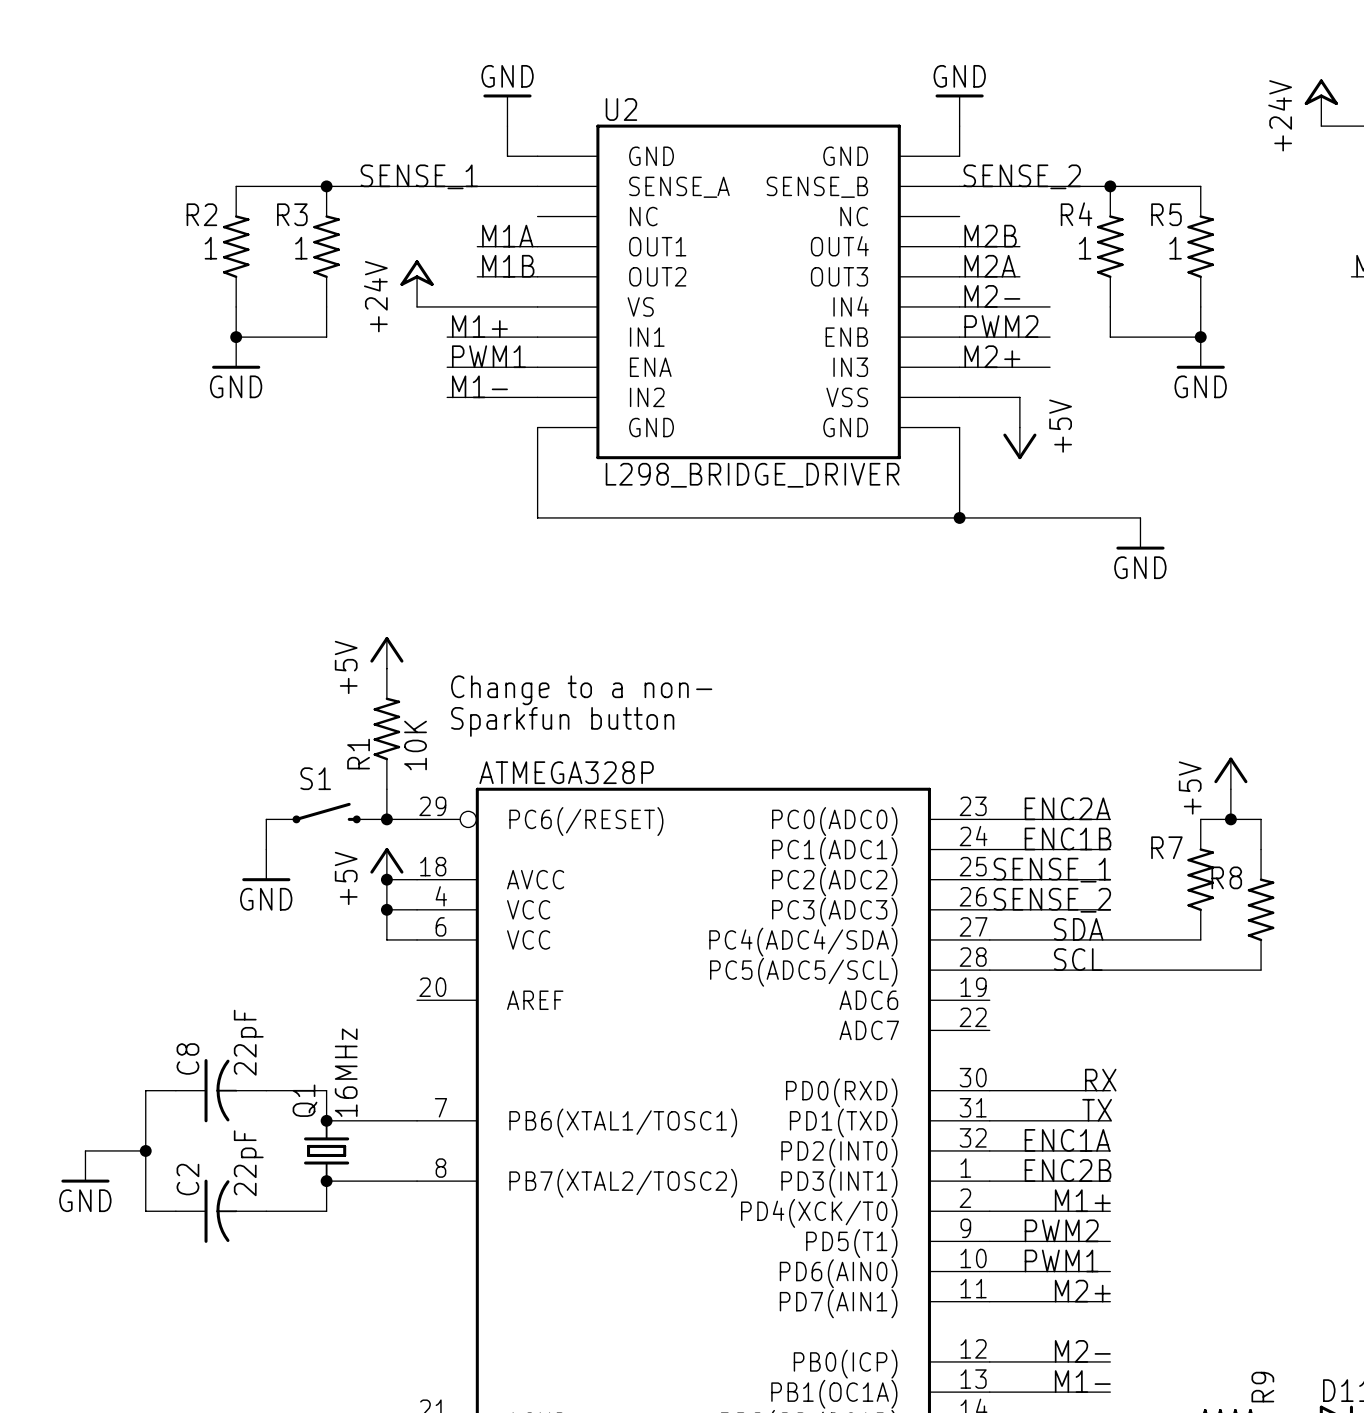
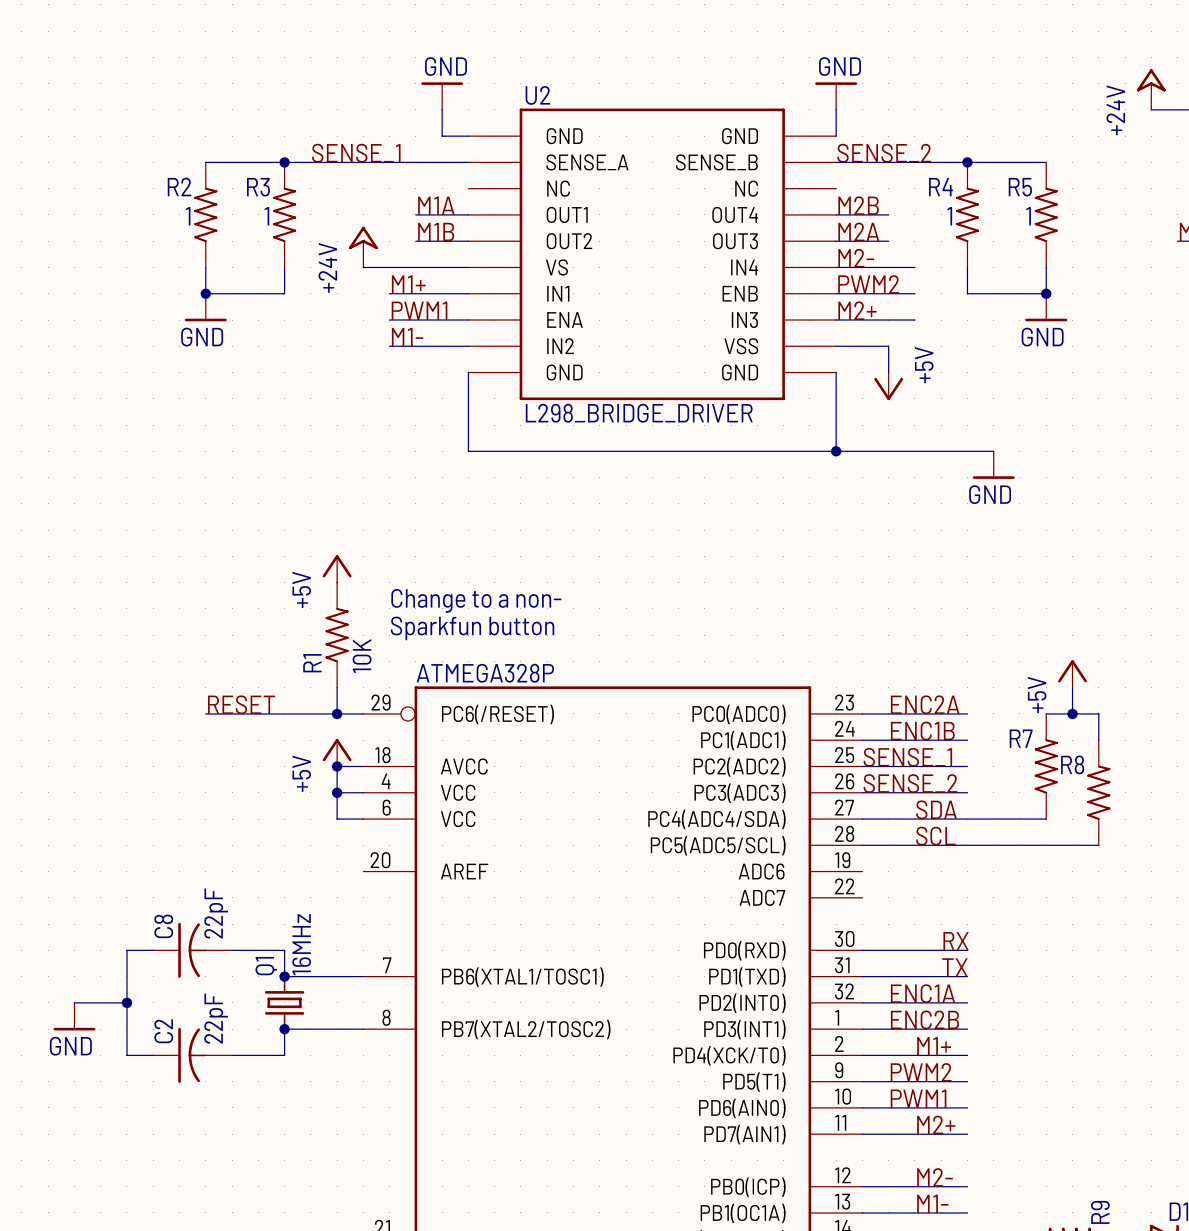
label: none -> RESET (241, 704)
S1: (326, 813) -> none
wire: none -> (205, 713) (337, 713)
wire: (266, 819) (266, 849) -> none
power symbol: GND (266, 865) -> none

